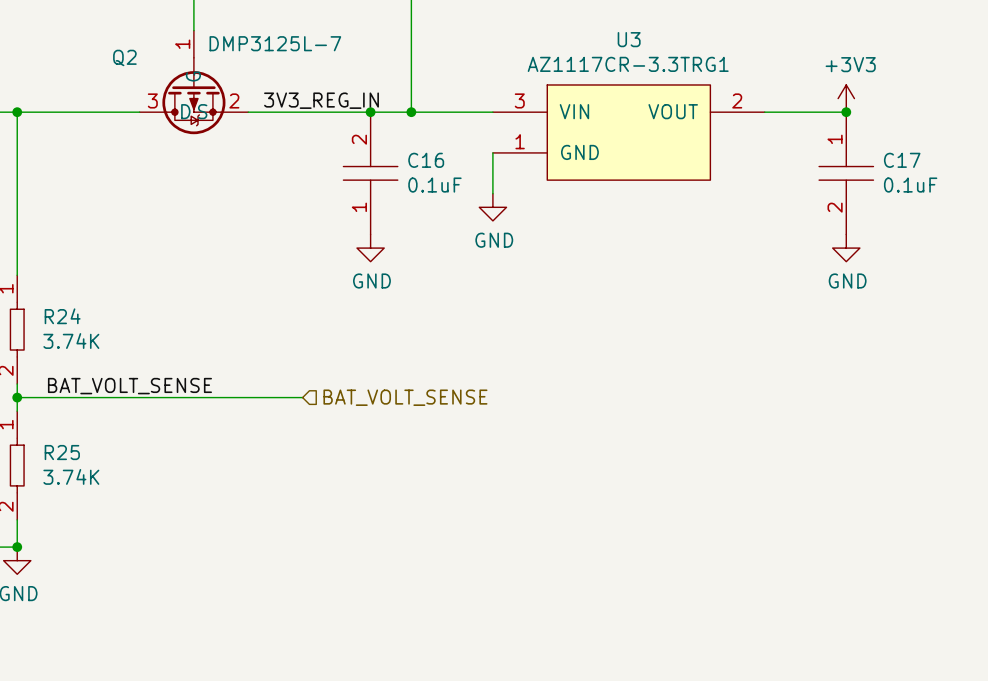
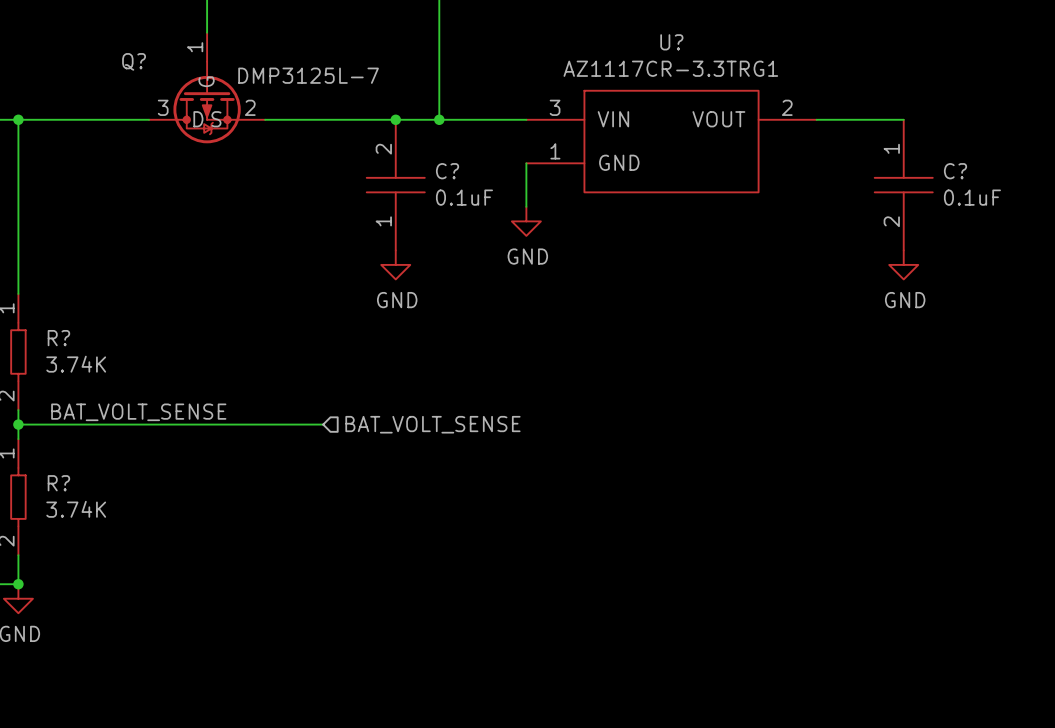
U3 name: U3 (629, 39) -> U? (671, 42)
Q2 text position: DMP3125L-7 (275, 43) -> DMP3125L-7 (308, 75)
Q2 name: Q2 (124, 57) -> Q? (134, 61)
power symbol: +3V3 (846, 98) -> none
label: 3V3_REG_IN (321, 100) -> none
junction: (846, 112) -> none
C16 name: C16 (426, 160) -> C? (447, 171)
C17 name: C17 (902, 160) -> C? (955, 171)
R24 name: R24 (62, 316) -> R? (58, 338)
R25 name: R25 (62, 452) -> R? (58, 483)

